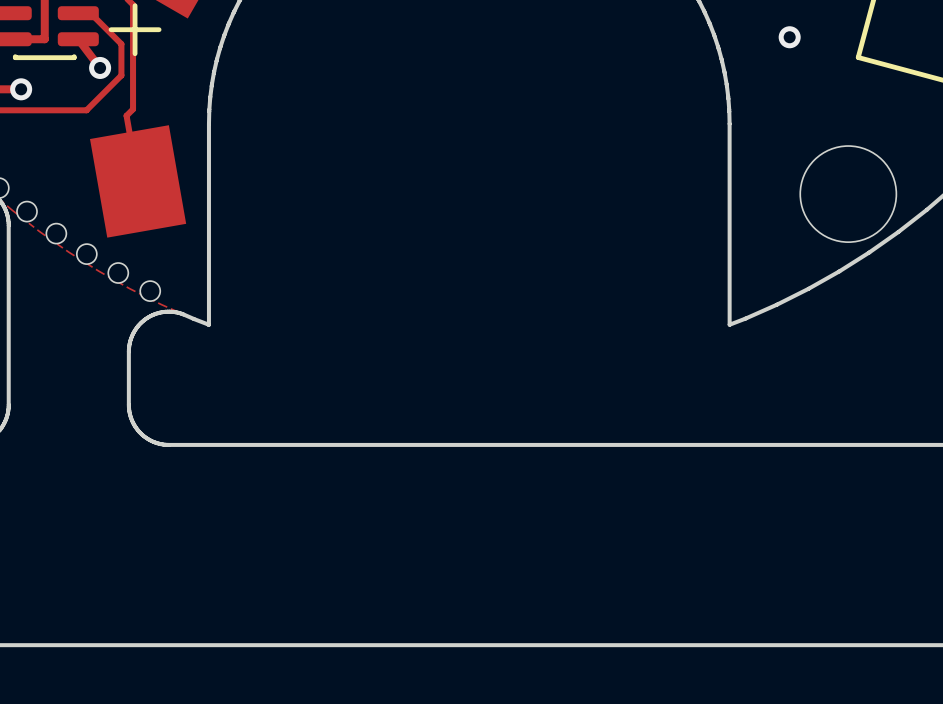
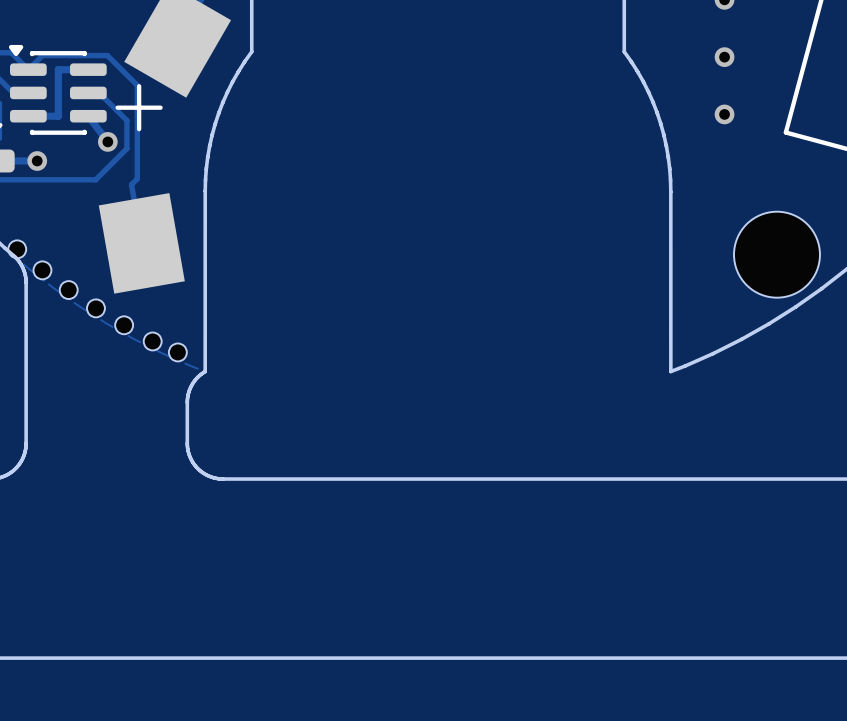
board edge: (209, 111) (208, 324) -> (205, 180) (205, 371) (194, 381) (188, 393) (187, 445) (190, 458) (199, 469) (211, 476) (223, 479)
part: none -> (177, 352)
board edge: (208, 324) (181, 313) (169, 311) (154, 314) (139, 324) (131, 336) (129, 347) (129, 410) (137, 430) (155, 442) (166, 444) (228, 444) -> none

